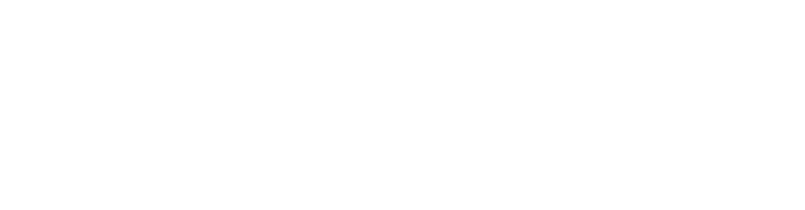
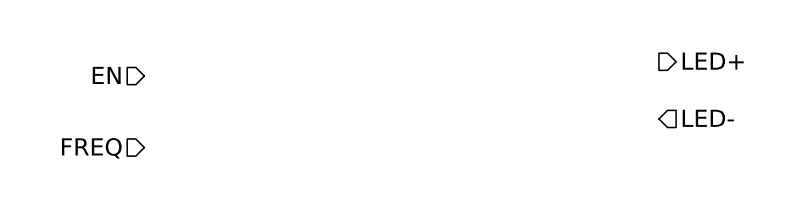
hierarchical label: none -> LED+ (713, 61)
hierarchical label: none -> EN (106, 75)
hierarchical label: none -> LED- (708, 118)
hierarchical label: none -> FREQ (91, 148)

